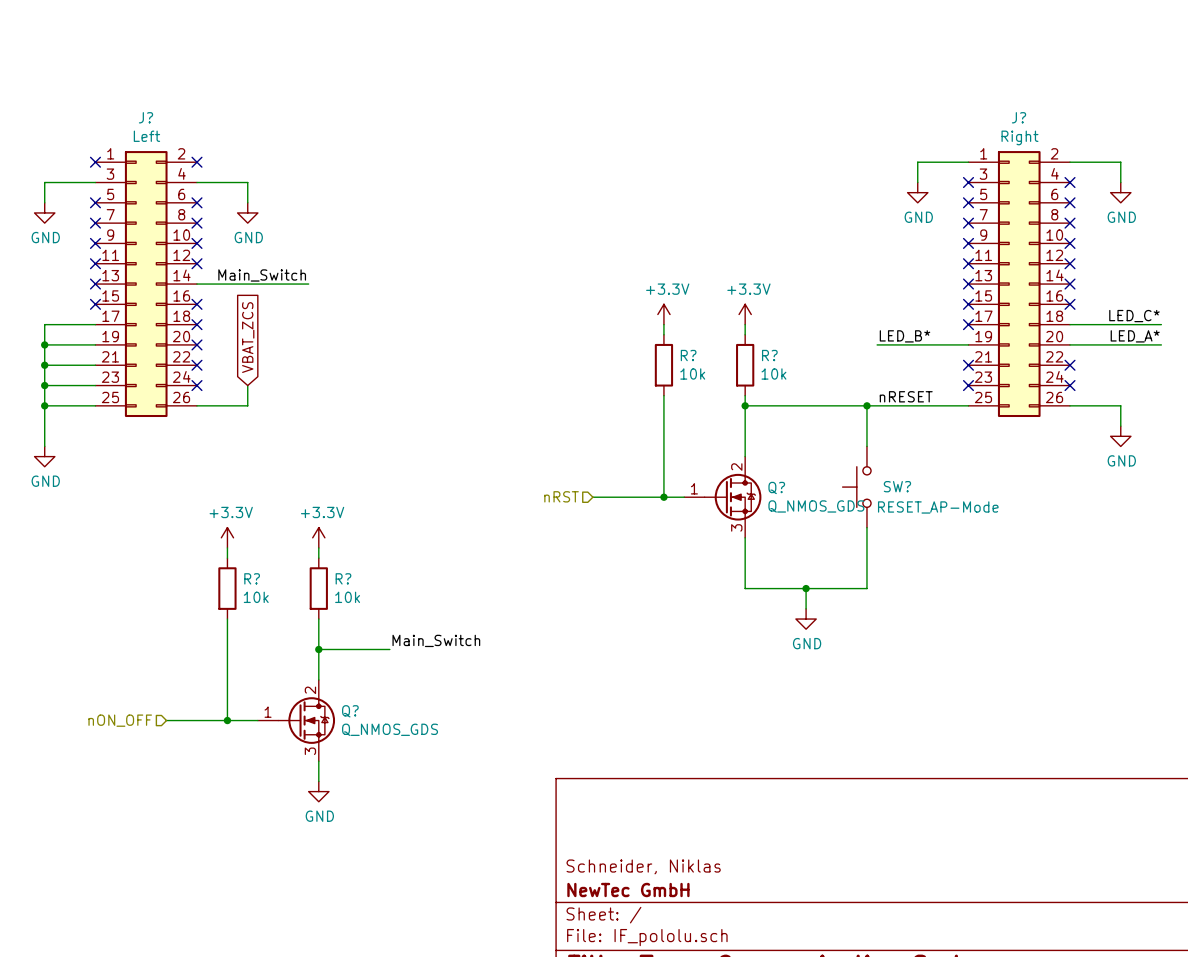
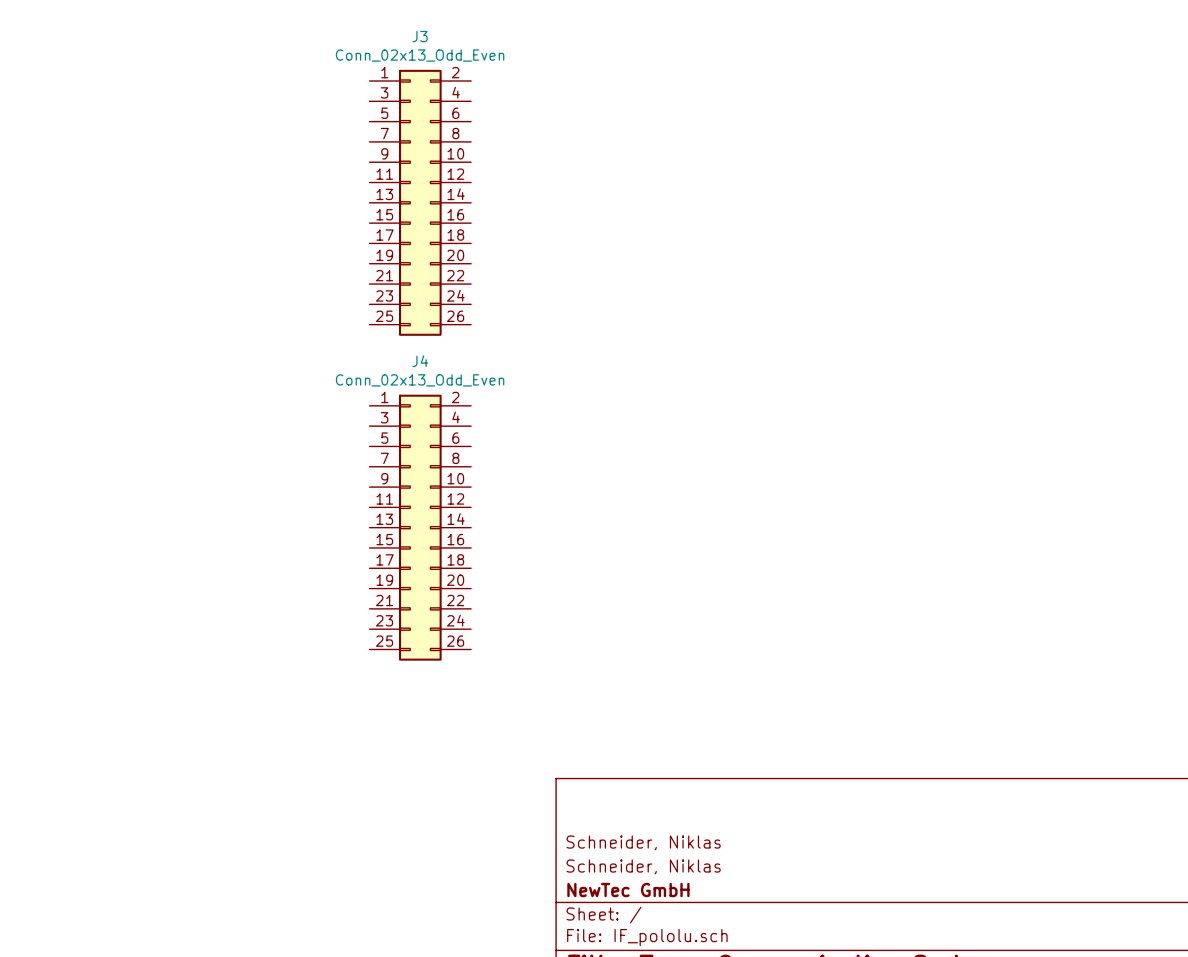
no-connect mark: (95, 162) -> none
no-connect mark: (196, 162) -> none
wire: (968, 162) (917, 162) (917, 182) -> none
wire: (1070, 162) (1120, 162) (1120, 182) -> none
wire: (95, 182) (44, 182) (44, 202) -> none
wire: (196, 182) (247, 182) (247, 202) -> none
no-connect mark: (968, 182) -> none
no-connect mark: (1070, 182) -> none
power symbol: GND (917, 192) -> none
power symbol: GND (1120, 192) -> none
no-connect mark: (95, 202) -> none
no-connect mark: (196, 202) -> none
J3: none -> Conn_02x13_Odd_Even (420, 202)
no-connect mark: (968, 202) -> none
no-connect mark: (1070, 202) -> none
power symbol: GND (44, 212) -> none
power symbol: GND (247, 212) -> none
no-connect mark: (95, 223) -> none
no-connect mark: (196, 223) -> none
no-connect mark: (968, 223) -> none
no-connect mark: (1070, 223) -> none
no-connect mark: (95, 243) -> none
no-connect mark: (196, 243) -> none
no-connect mark: (968, 243) -> none
no-connect mark: (1070, 243) -> none
no-connect mark: (95, 263) -> none
no-connect mark: (196, 263) -> none
no-connect mark: (968, 263) -> none
no-connect mark: (1070, 263) -> none
label: Main_Switch (262, 275) -> none
no-connect mark: (95, 284) -> none
J?: Left (146, 284) -> none
wire: (196, 284) (308, 284) -> none
no-connect mark: (968, 284) -> none
J?: Right (1019, 284) -> none
no-connect mark: (1070, 284) -> none
no-connect mark: (95, 304) -> none
no-connect mark: (196, 304) -> none
no-connect mark: (968, 304) -> none
no-connect mark: (1070, 304) -> none
power symbol: +3.3V (663, 314) -> none
power symbol: +3.3V (745, 314) -> none
label: LED_C* (1134, 316) -> none
wire: (95, 324) (44, 324) (44, 446) -> none
no-connect mark: (196, 324) -> none
wire: (663, 324) (663, 334) -> none
wire: (745, 324) (745, 334) -> none
no-connect mark: (968, 324) -> none
wire: (1070, 324) (1161, 324) -> none
label: LED_B* (905, 336) -> none
label: LED_A* (1135, 336) -> none
global label: VBAT_ZCS (248, 337) -> none
wire: (44, 344) (95, 344) -> none
junction: (44, 344) -> none
no-connect mark: (196, 344) -> none
wire: (877, 344) (968, 344) -> none
wire: (1070, 344) (1161, 344) -> none
wire: (44, 365) (95, 365) -> none
junction: (44, 365) -> none
no-connect mark: (196, 365) -> none
R?: 10k (663, 365) -> none
R?: 10k (745, 365) -> none
no-connect mark: (968, 365) -> none
no-connect mark: (1070, 365) -> none
wire: (44, 385) (95, 385) -> none
junction: (44, 385) -> none
no-connect mark: (196, 385) -> none
wire: (247, 385) (247, 405) (196, 405) -> none
no-connect mark: (968, 385) -> none
no-connect mark: (1070, 385) -> none
wire: (663, 395) (663, 497) -> none
wire: (745, 395) (745, 456) -> none
label: nRESET (906, 396) -> none
wire: (44, 405) (95, 405) -> none
junction: (44, 405) -> none
wire: (745, 405) (968, 405) -> none
junction: (745, 405) -> none
wire: (866, 405) (866, 446) -> none
junction: (866, 405) -> none
wire: (1070, 405) (1120, 405) (1120, 426) -> none
power symbol: GND (1120, 436) -> none
power symbol: GND (44, 456) -> none
SW?: RESET_AP-Mode (856, 487) -> none
hierarchical label: nRST (561, 496) -> none
wire: (592, 497) (684, 497) -> none
junction: (663, 497) -> none
Q?: Q_NMOS_GDS (722, 497) -> none
J4: none -> Conn_02x13_Odd_Even (420, 527)
wire: (866, 527) (866, 588) (745, 588) (745, 537) -> none
power symbol: +3.3V (227, 537) -> none
power symbol: +3.3V (318, 537) -> none
wire: (227, 547) (227, 558) -> none
wire: (318, 547) (318, 558) -> none
R?: 10k (227, 588) -> none
R?: 10k (318, 588) -> none
wire: (806, 588) (806, 608) -> none
junction: (806, 588) -> none
wire: (227, 619) (227, 720) -> none
wire: (318, 619) (318, 679) -> none
power symbol: GND (806, 619) -> none
label: Main_Switch (436, 640) -> none
wire: (318, 649) (389, 649) -> none
junction: (318, 649) -> none
hierarchical label: nON_OFF (120, 720) -> none
wire: (166, 720) (257, 720) -> none
junction: (227, 720) -> none
Q?: Q_NMOS_GDS (296, 720) -> none
wire: (318, 761) (318, 781) -> none
power symbol: GND (318, 791) -> none
title block: none -> Schneider, Niklas (643, 842)

